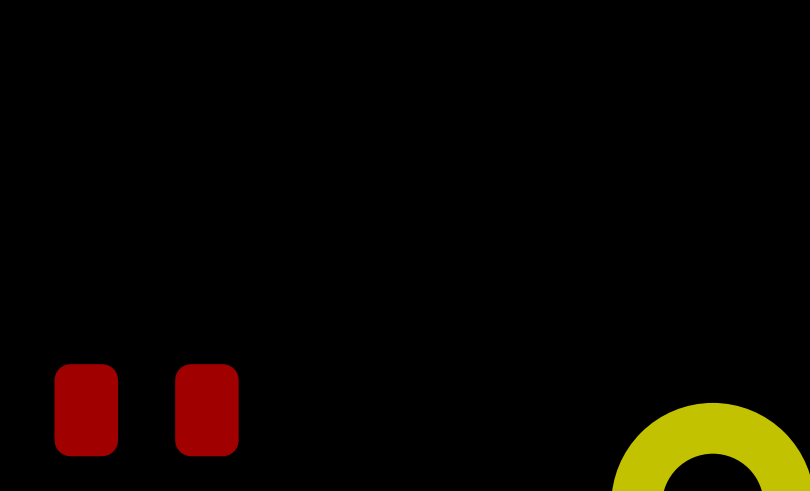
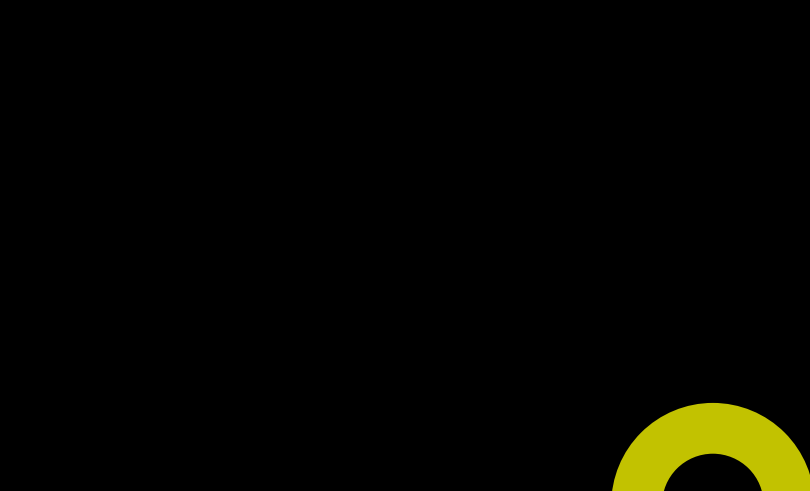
part: (146, 410) -> none

